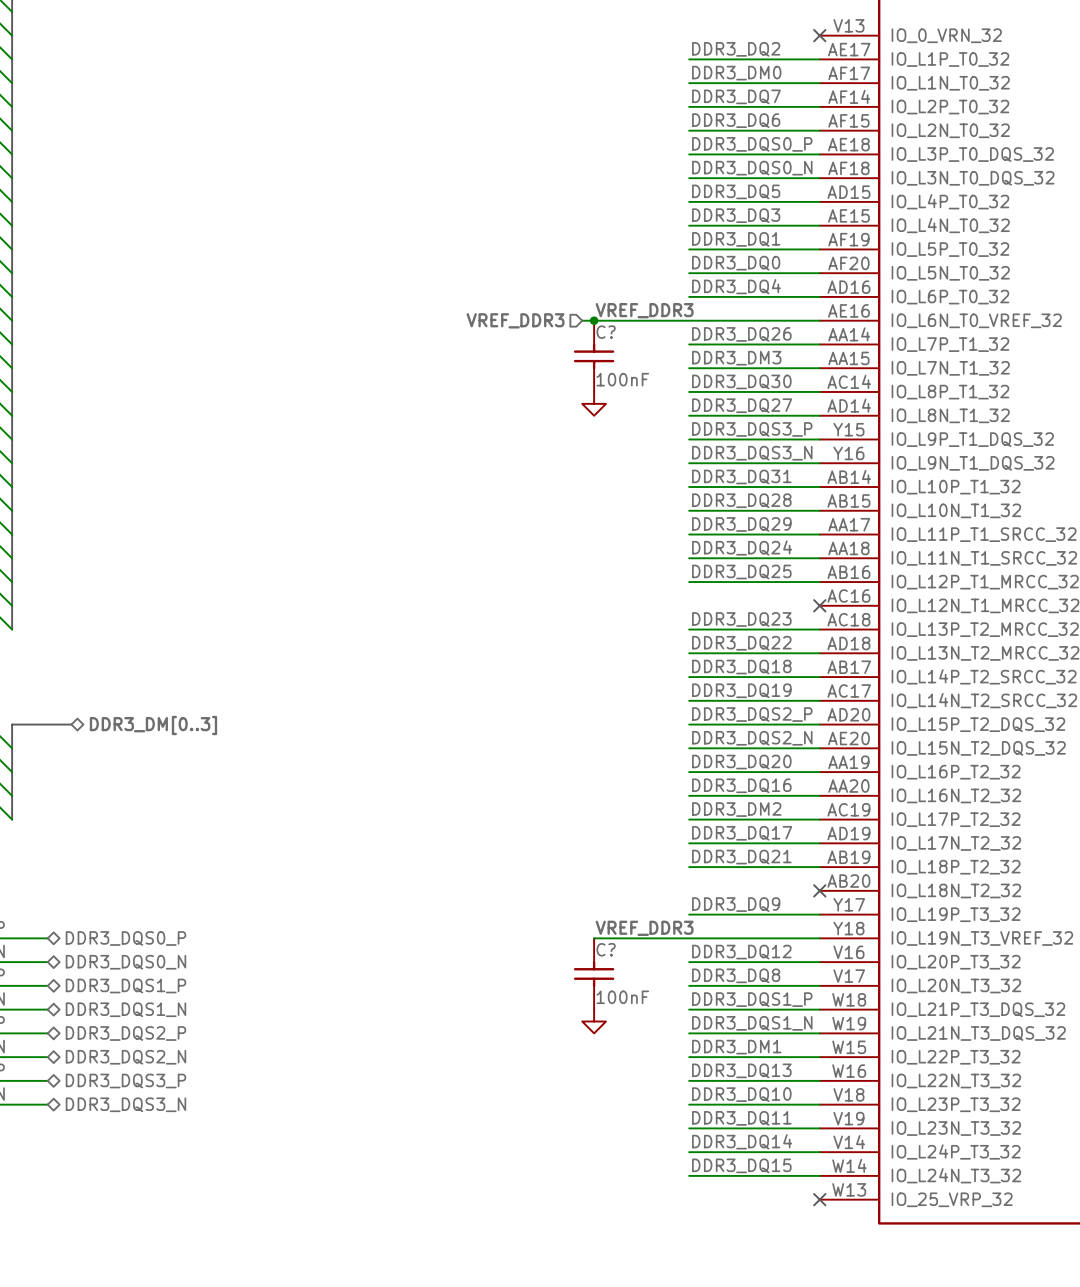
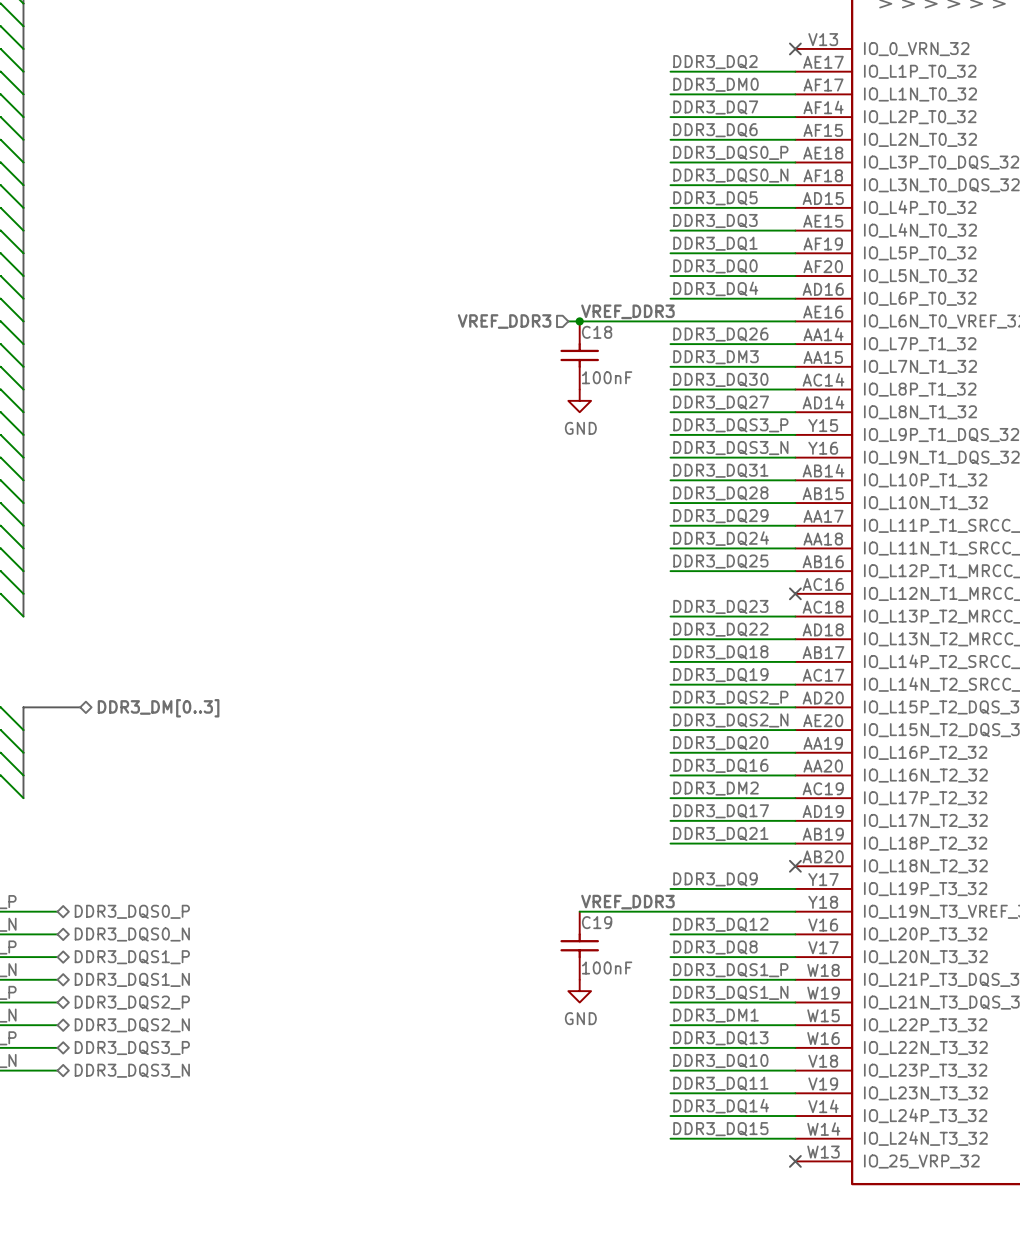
C? name: C? (606, 332) -> C18 (597, 332)
power symbol text: none -> GND (580, 428)
C? name: C? (606, 949) -> C19 (597, 922)
power symbol text: none -> GND (580, 1018)

